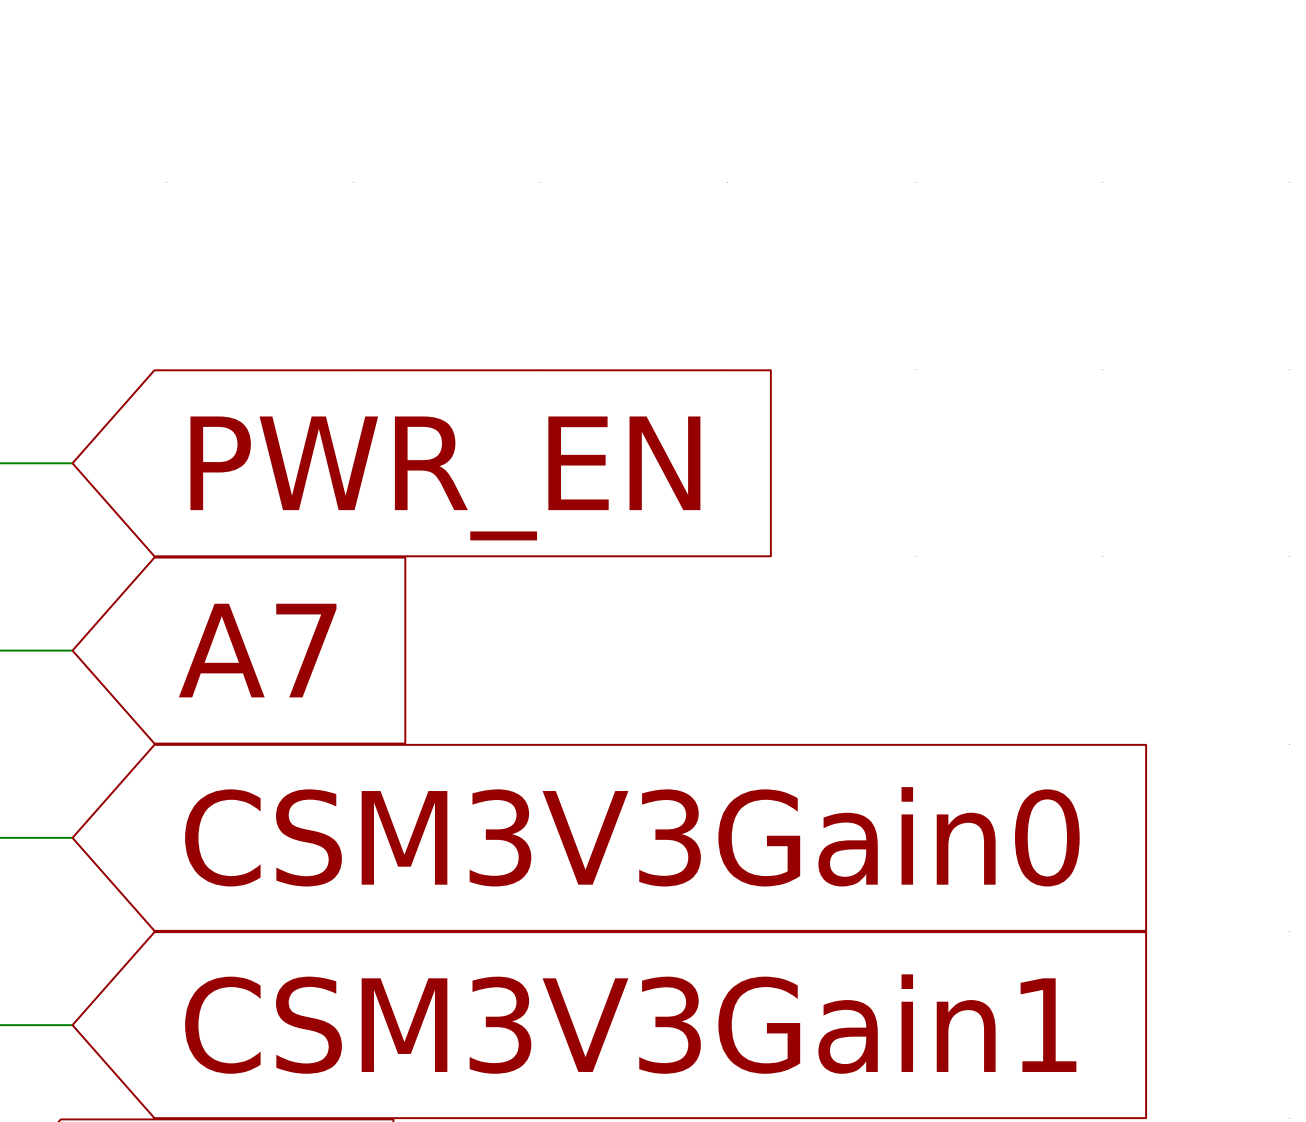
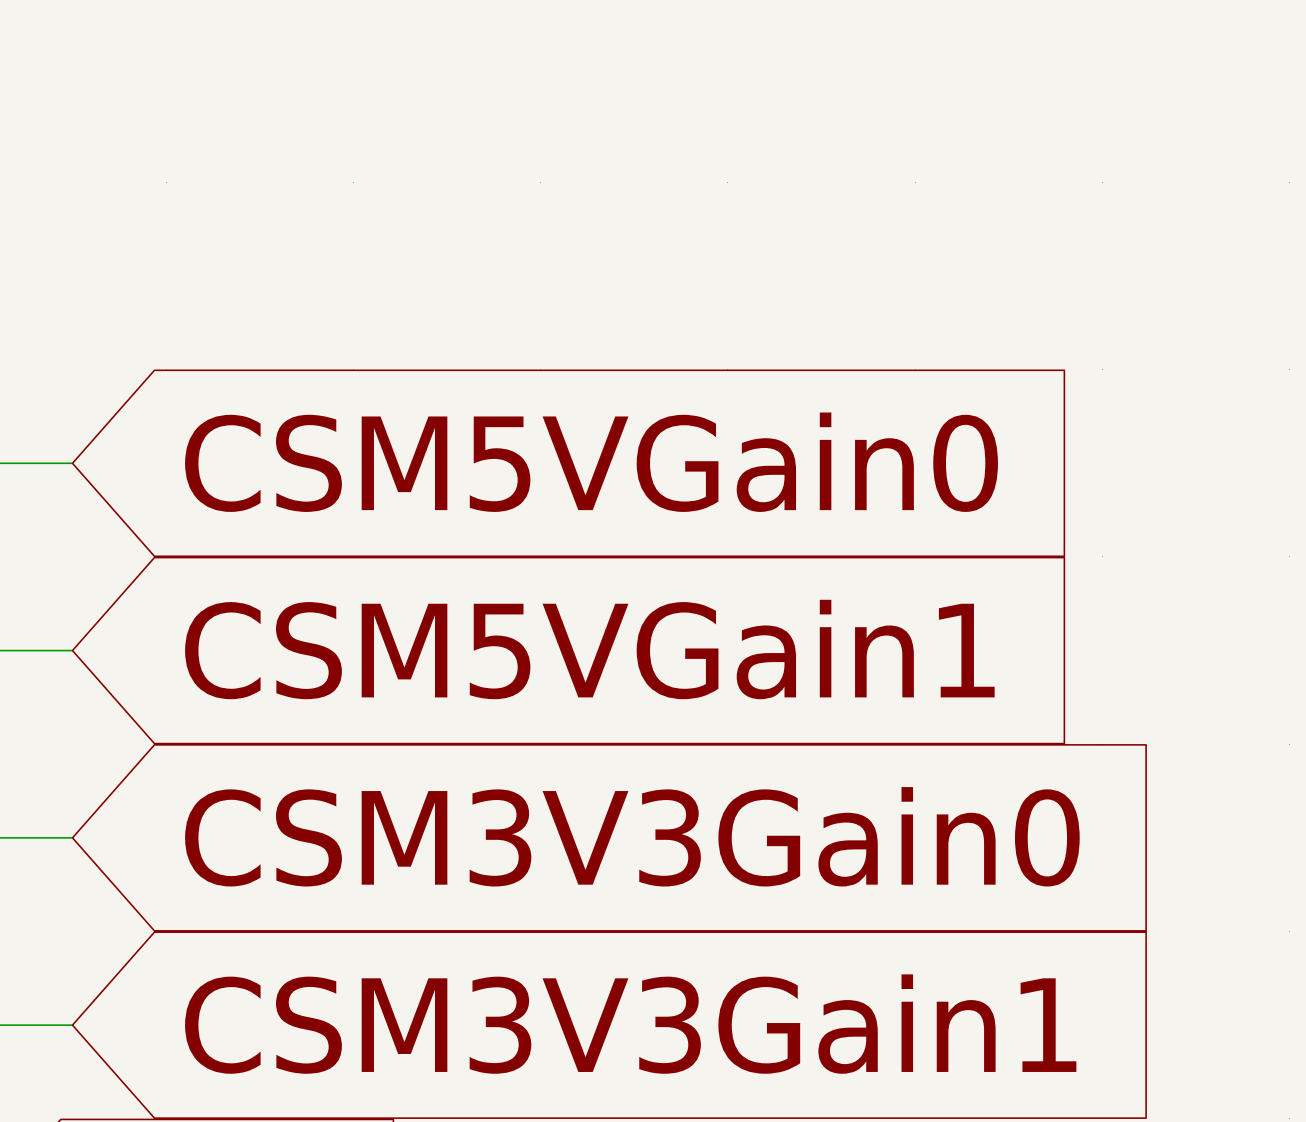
global label: PWR_EN (445, 478) -> CSM5VGain0 (591, 462)
global label: A7 (257, 650) -> CSM5VGain1 (589, 649)

